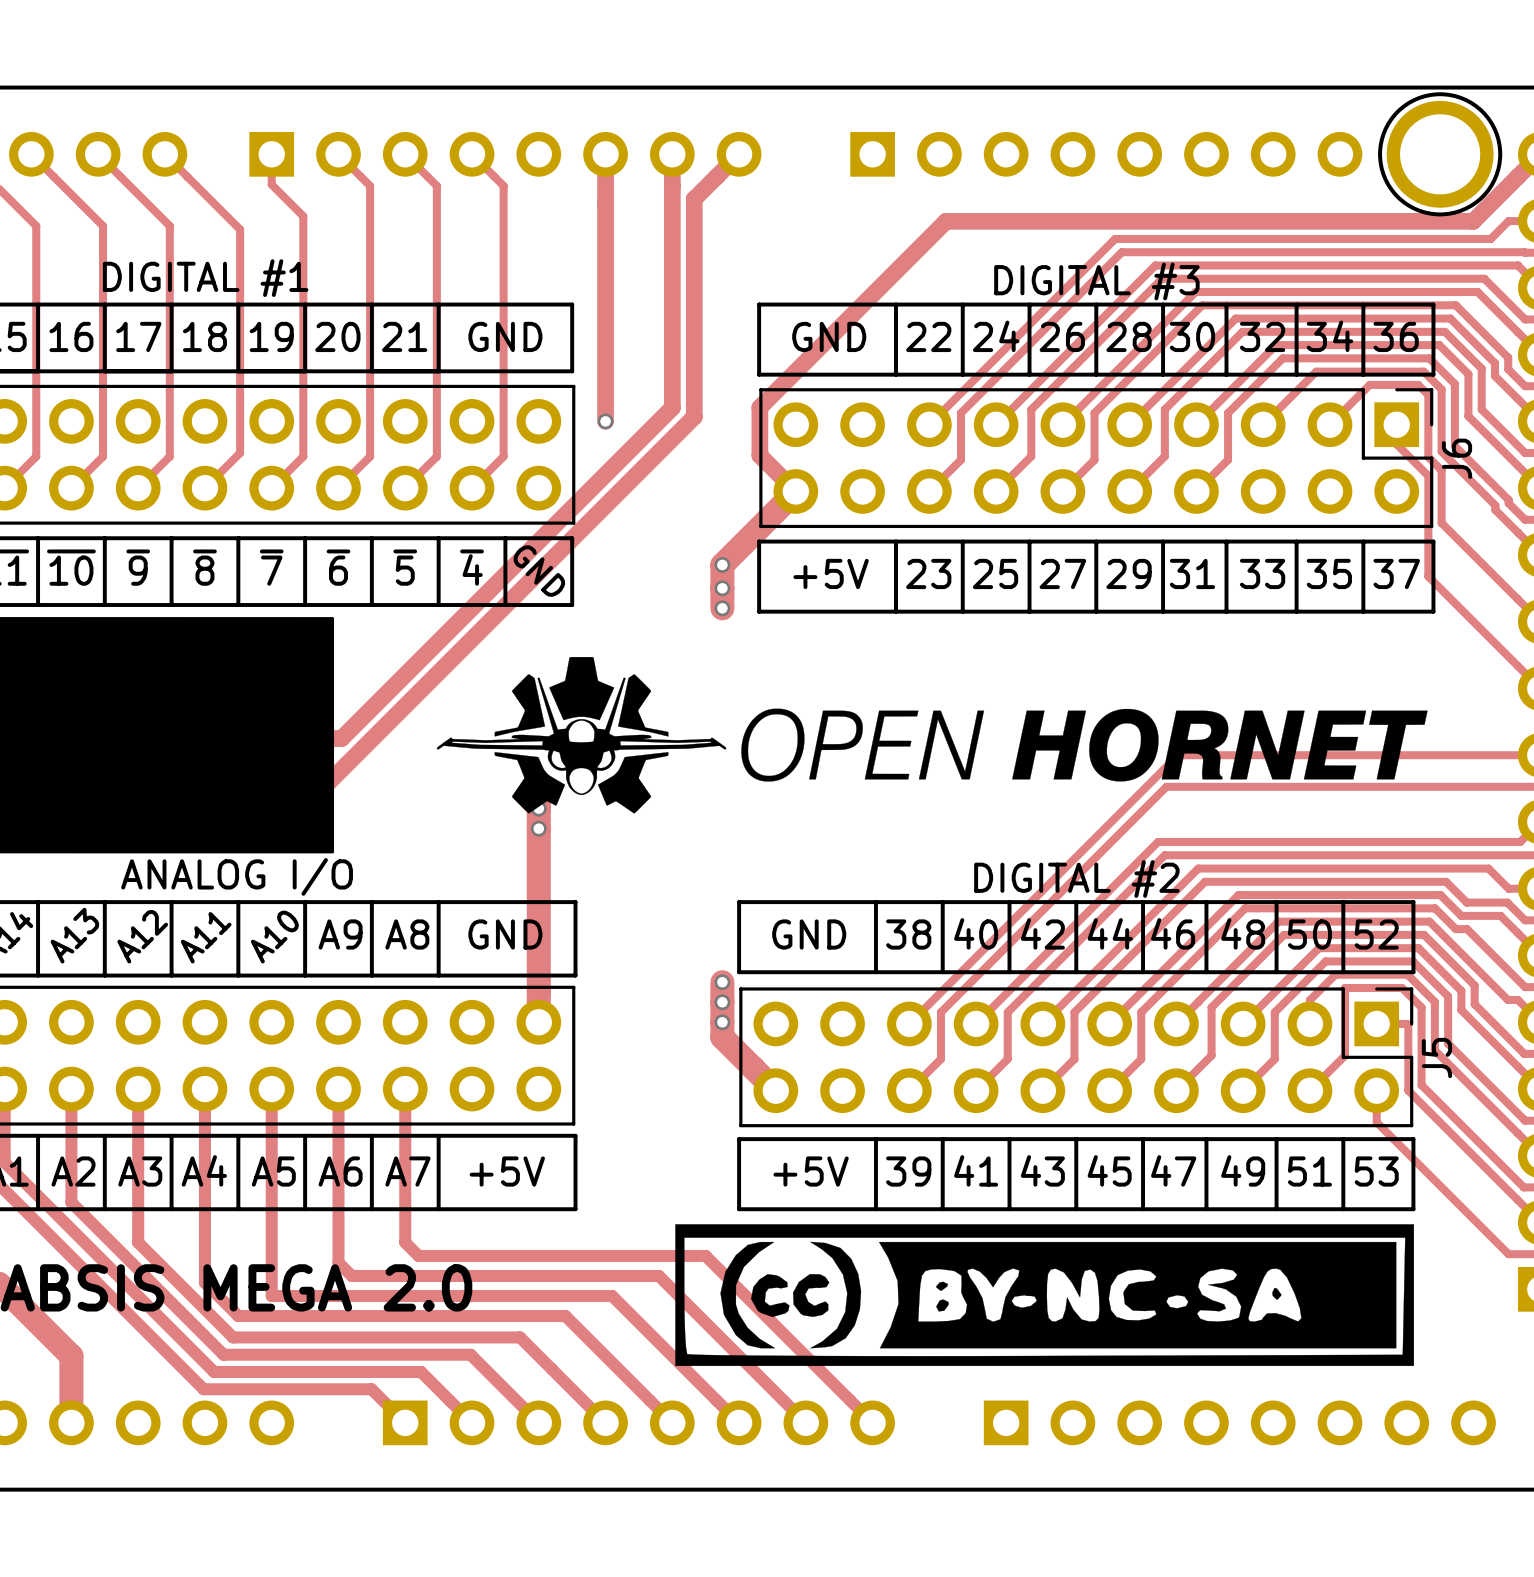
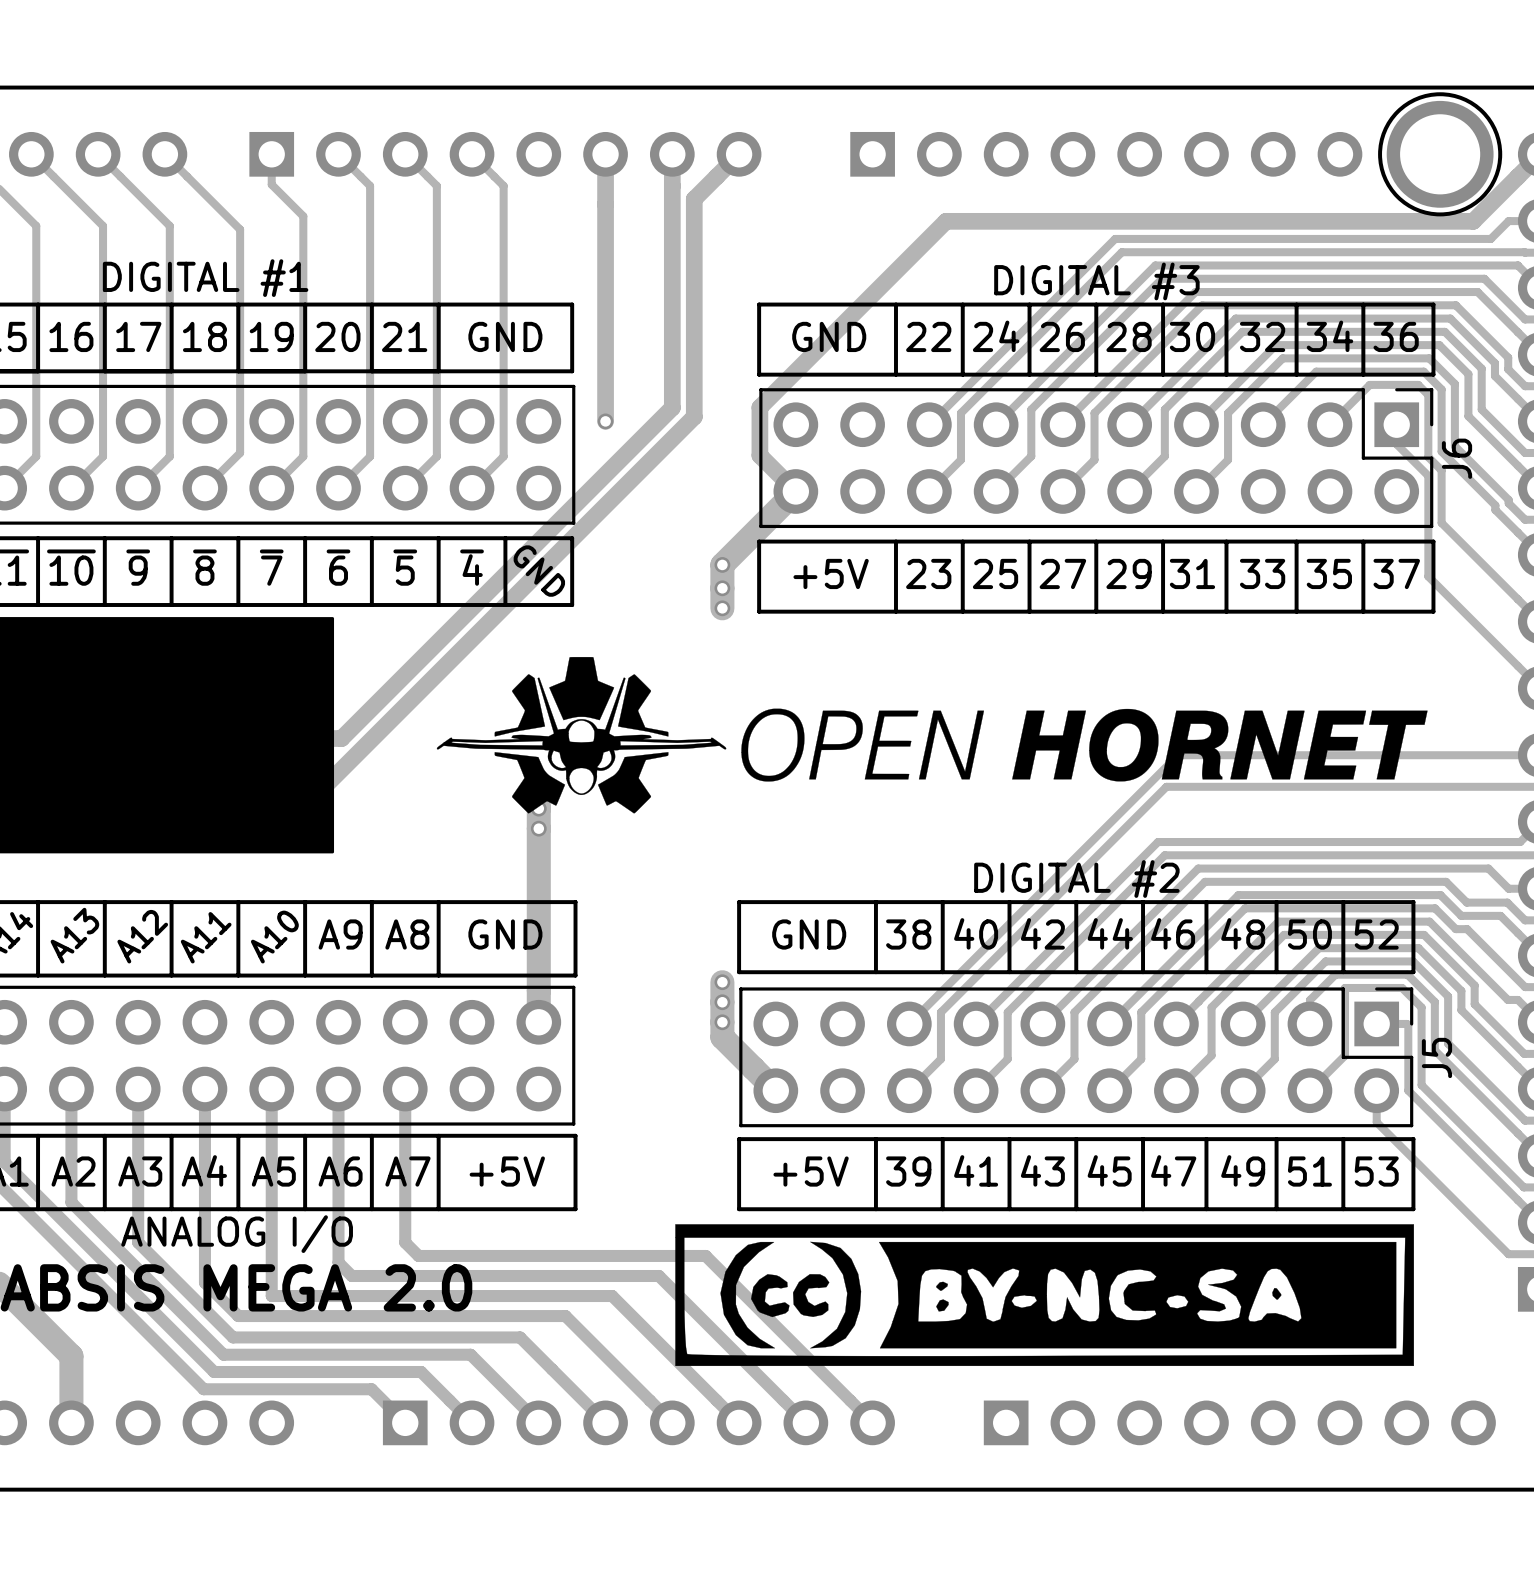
part value position: ANALOG I/O (237, 876) -> ANALOG I/O (237, 1234)

